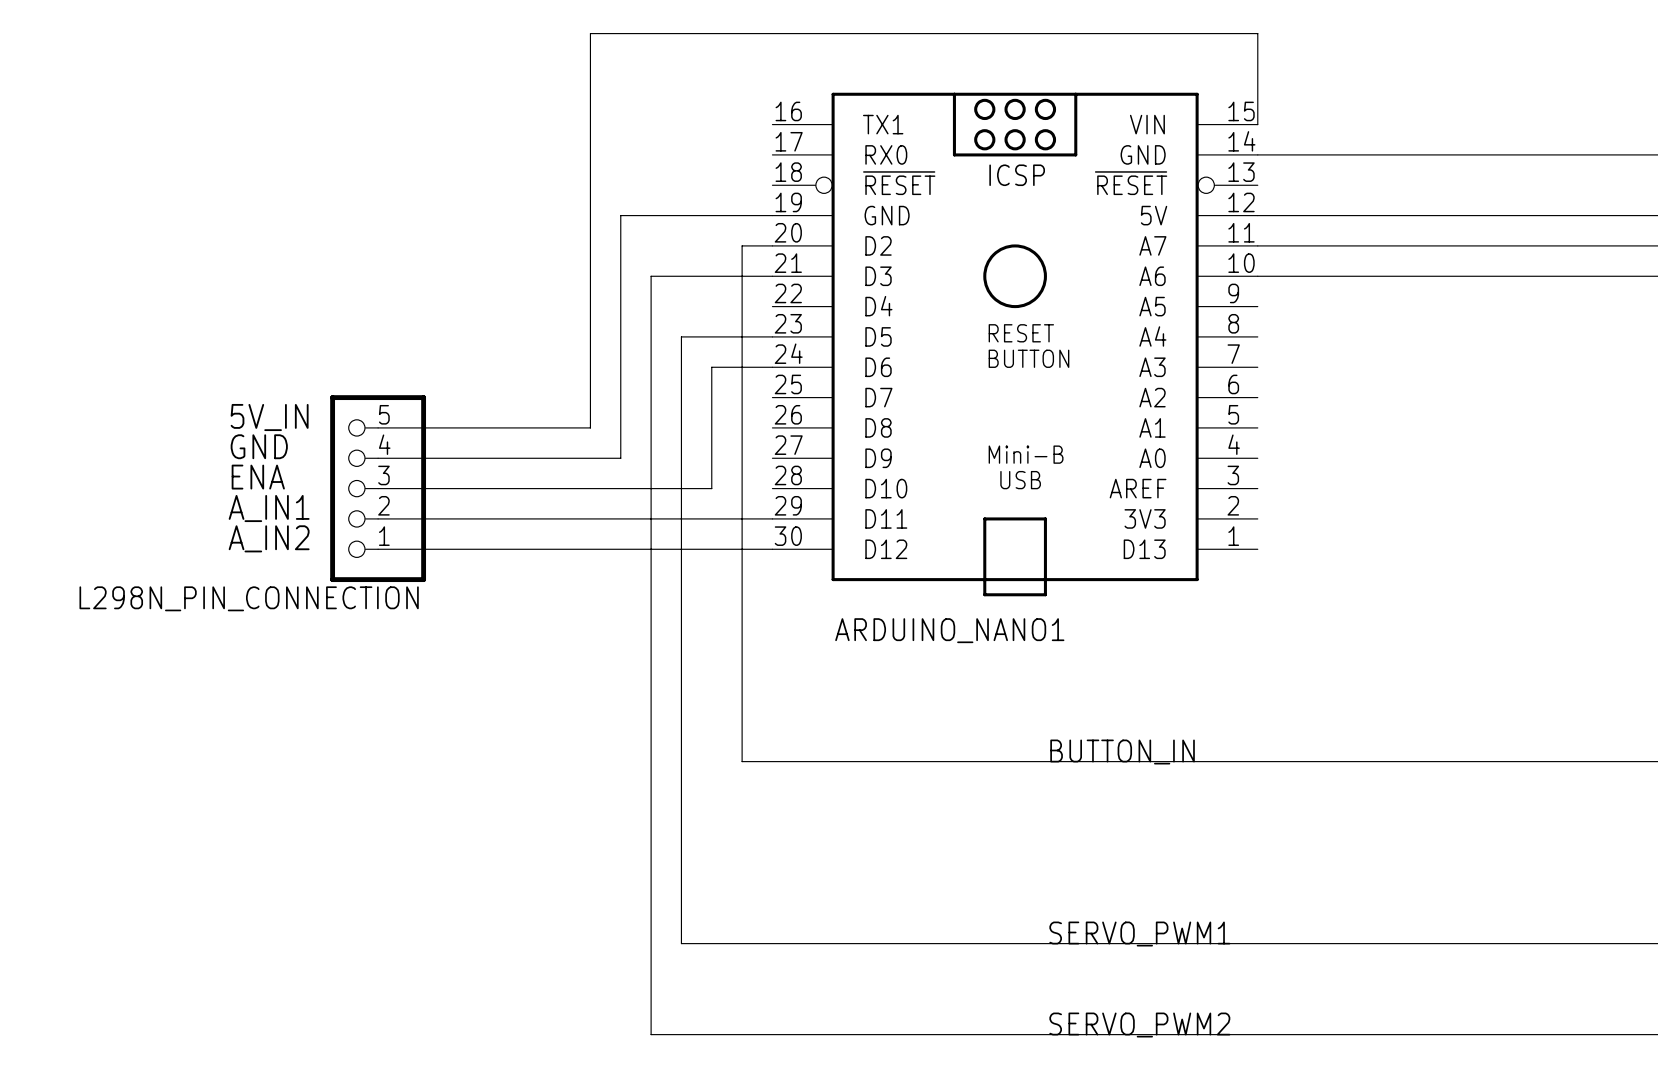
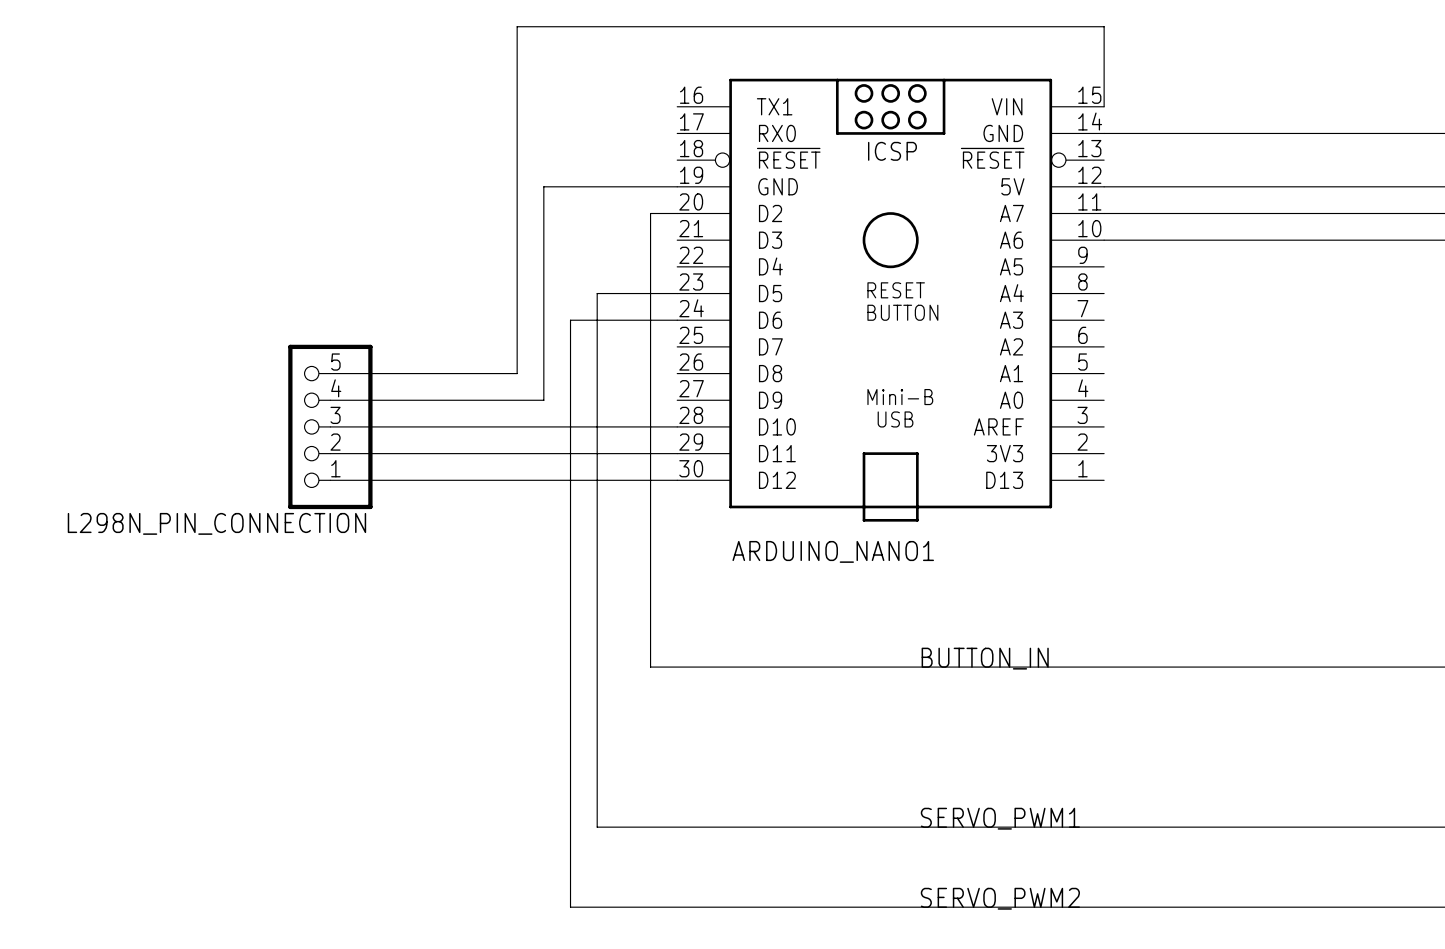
wire: (772, 276) (651, 276) (651, 367) -> (623, 320) (570, 320)
wire: (711, 367) (711, 488) -> (677, 426) (623, 426)
text: 5V_IN (269, 417) -> none
text: GND (259, 446) -> none
text: ENA (258, 477) -> none
text: A_IN1 (269, 508) -> none
text: A_IN2 (269, 538) -> none

